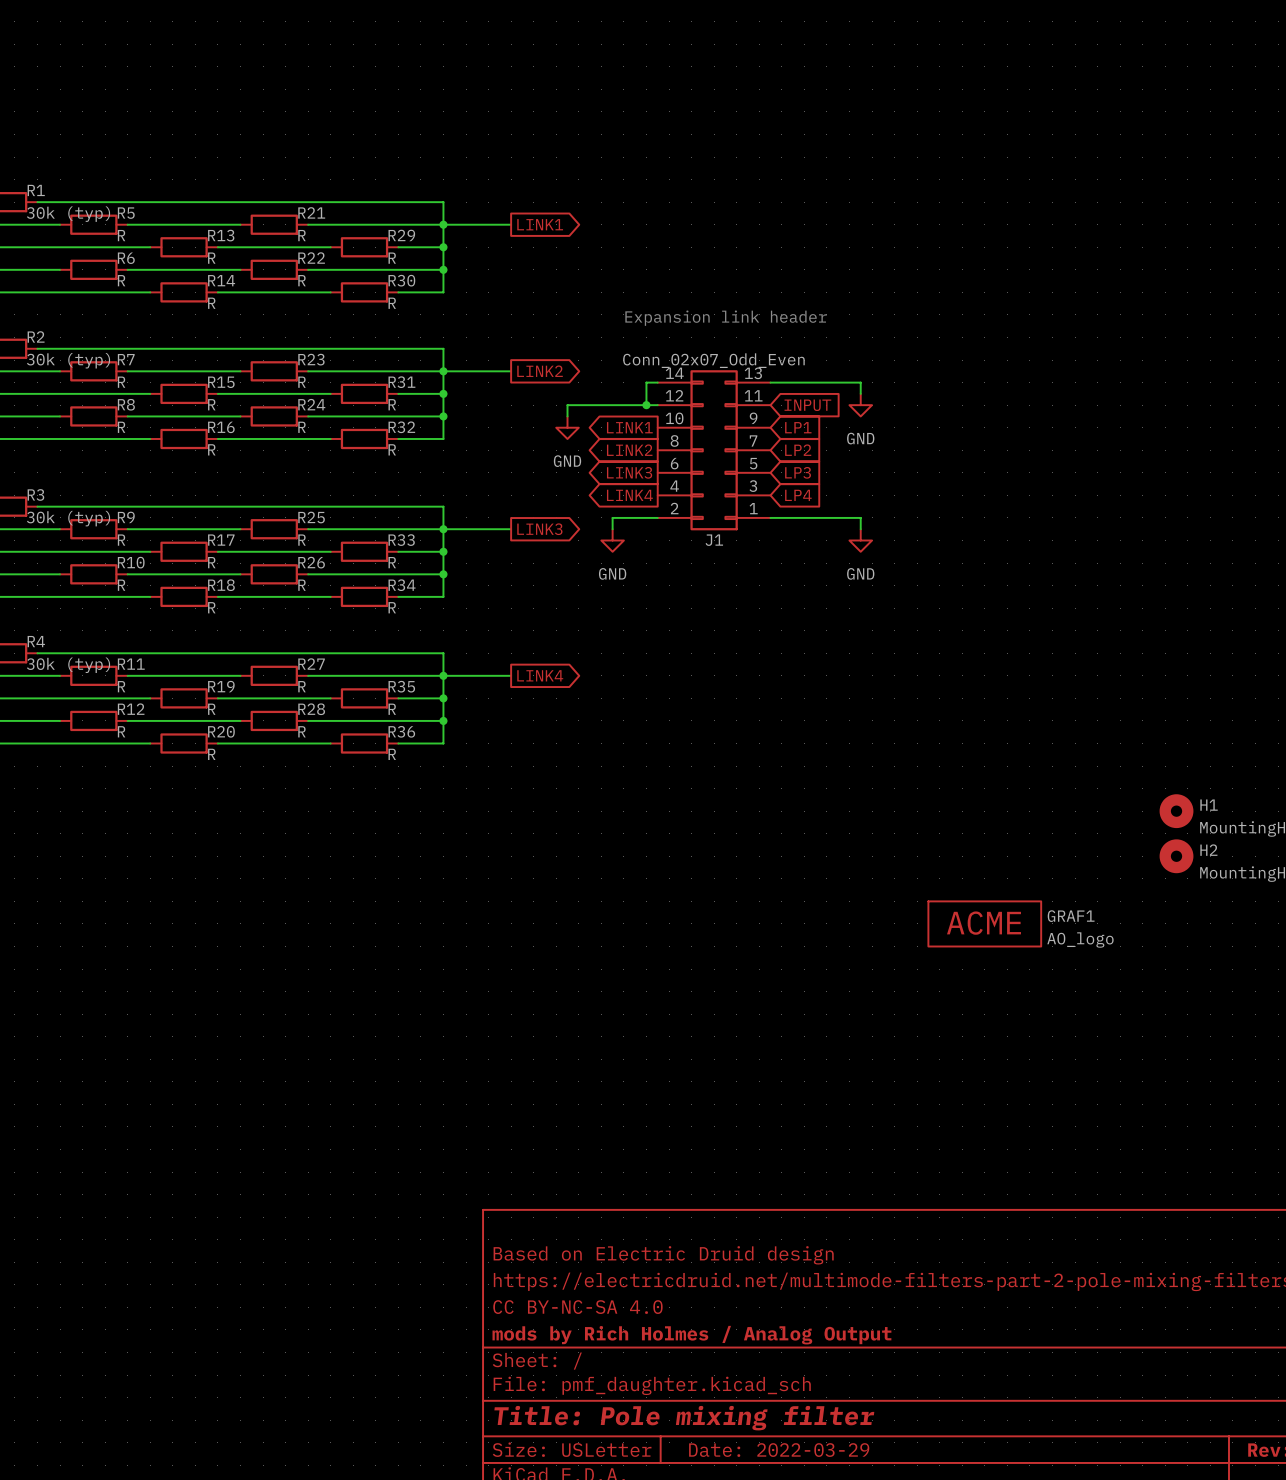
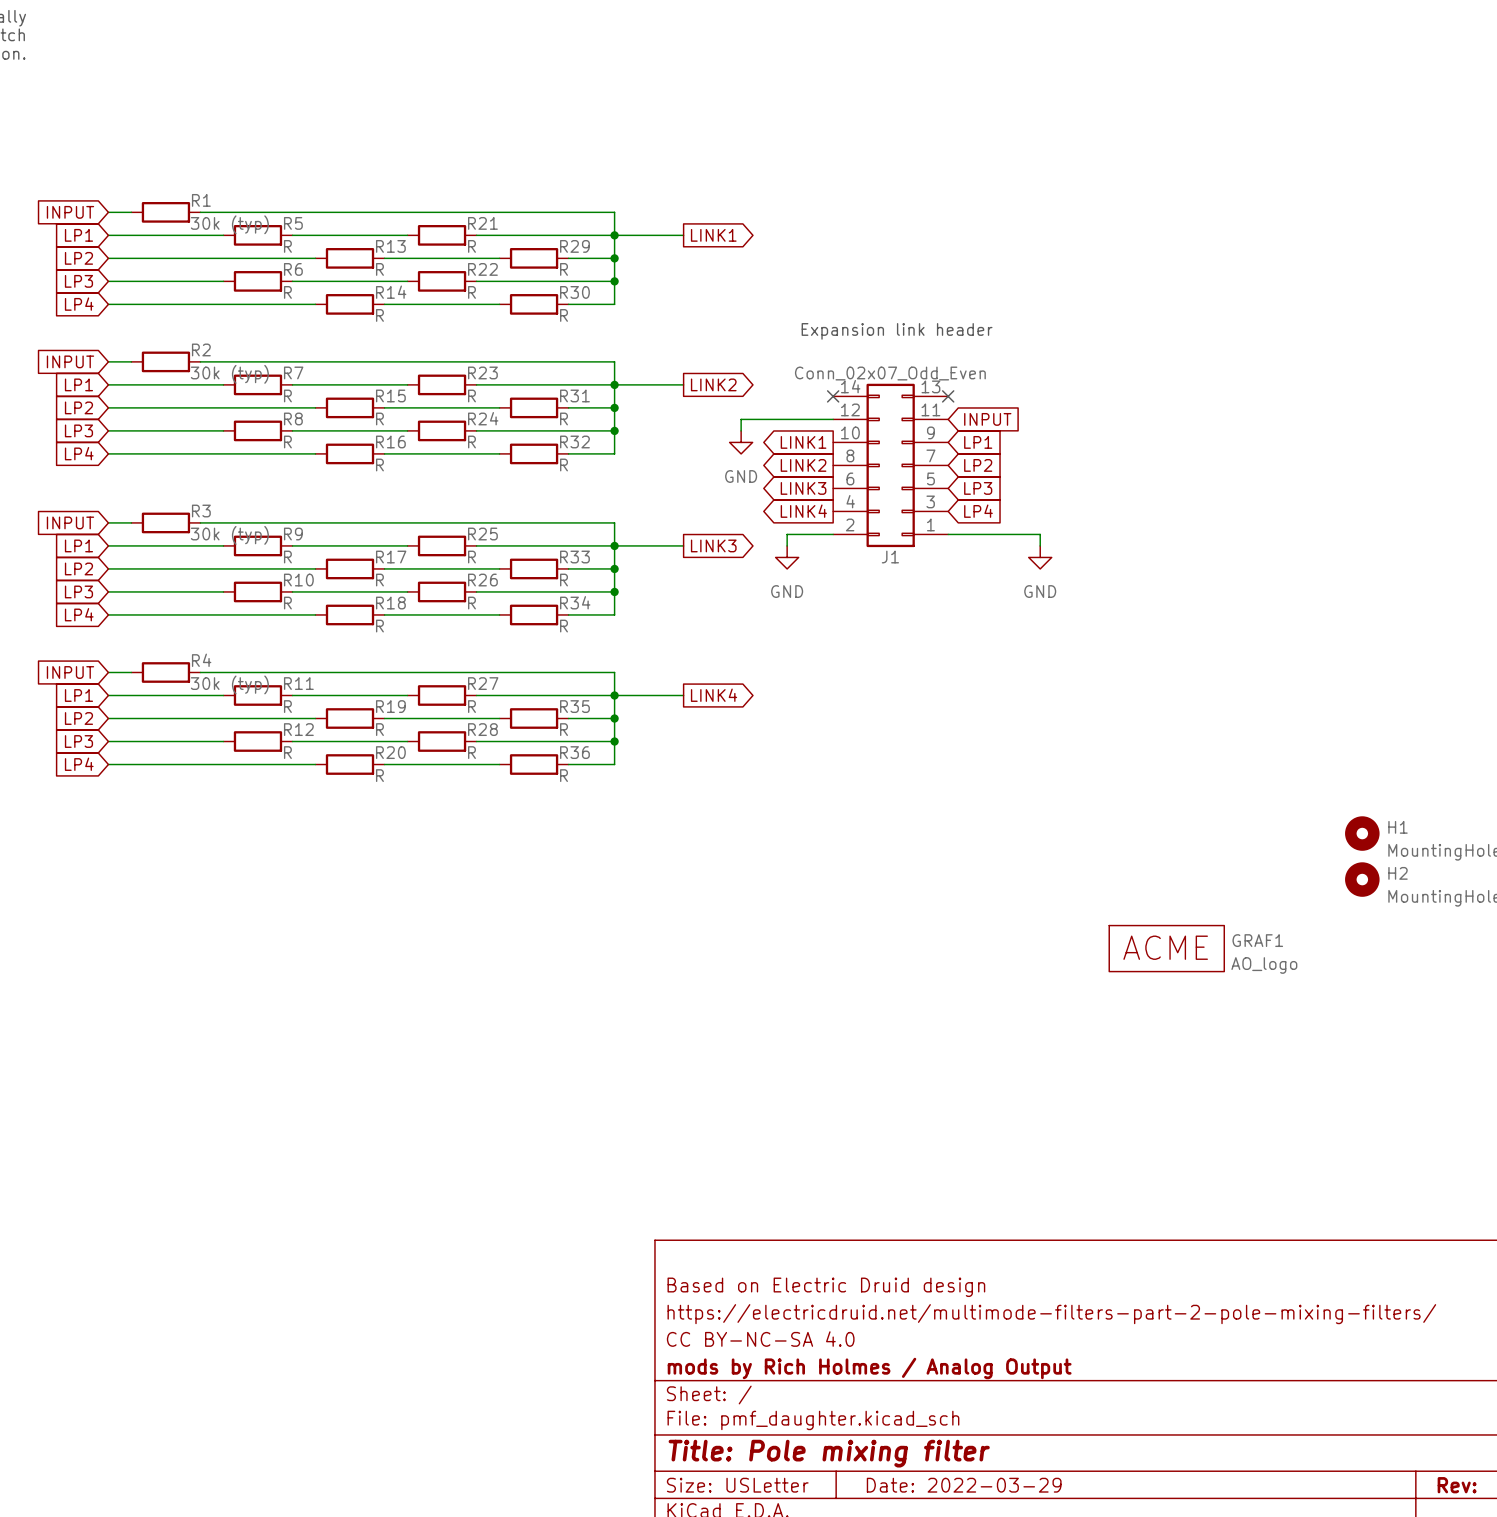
wire: (657, 382) (646, 382) (646, 405) -> none
no-connect mark: none -> (833, 396)
wire: (770, 382) (860, 382) (860, 393) -> none
no-connect mark: none -> (948, 396)
junction: (646, 405) -> none
power symbol: GND (860, 405) -> none

